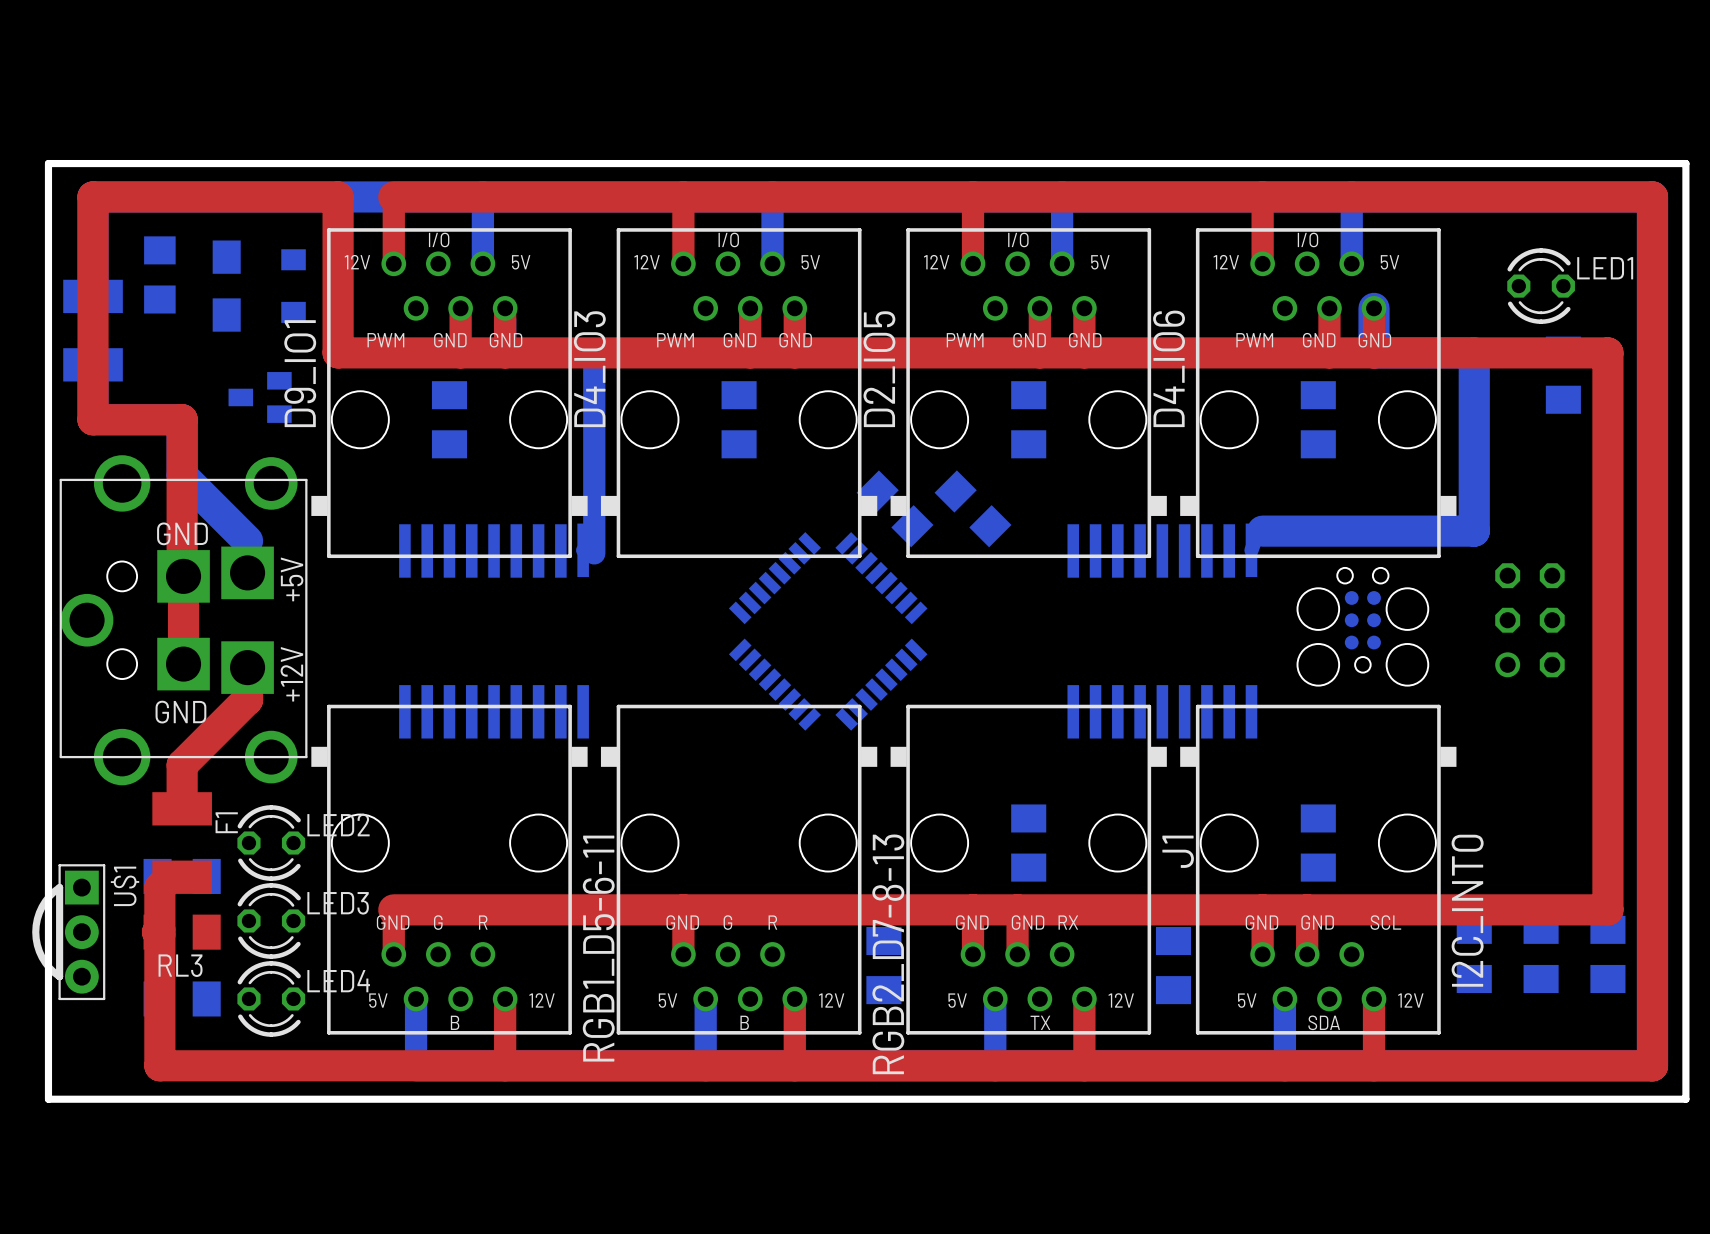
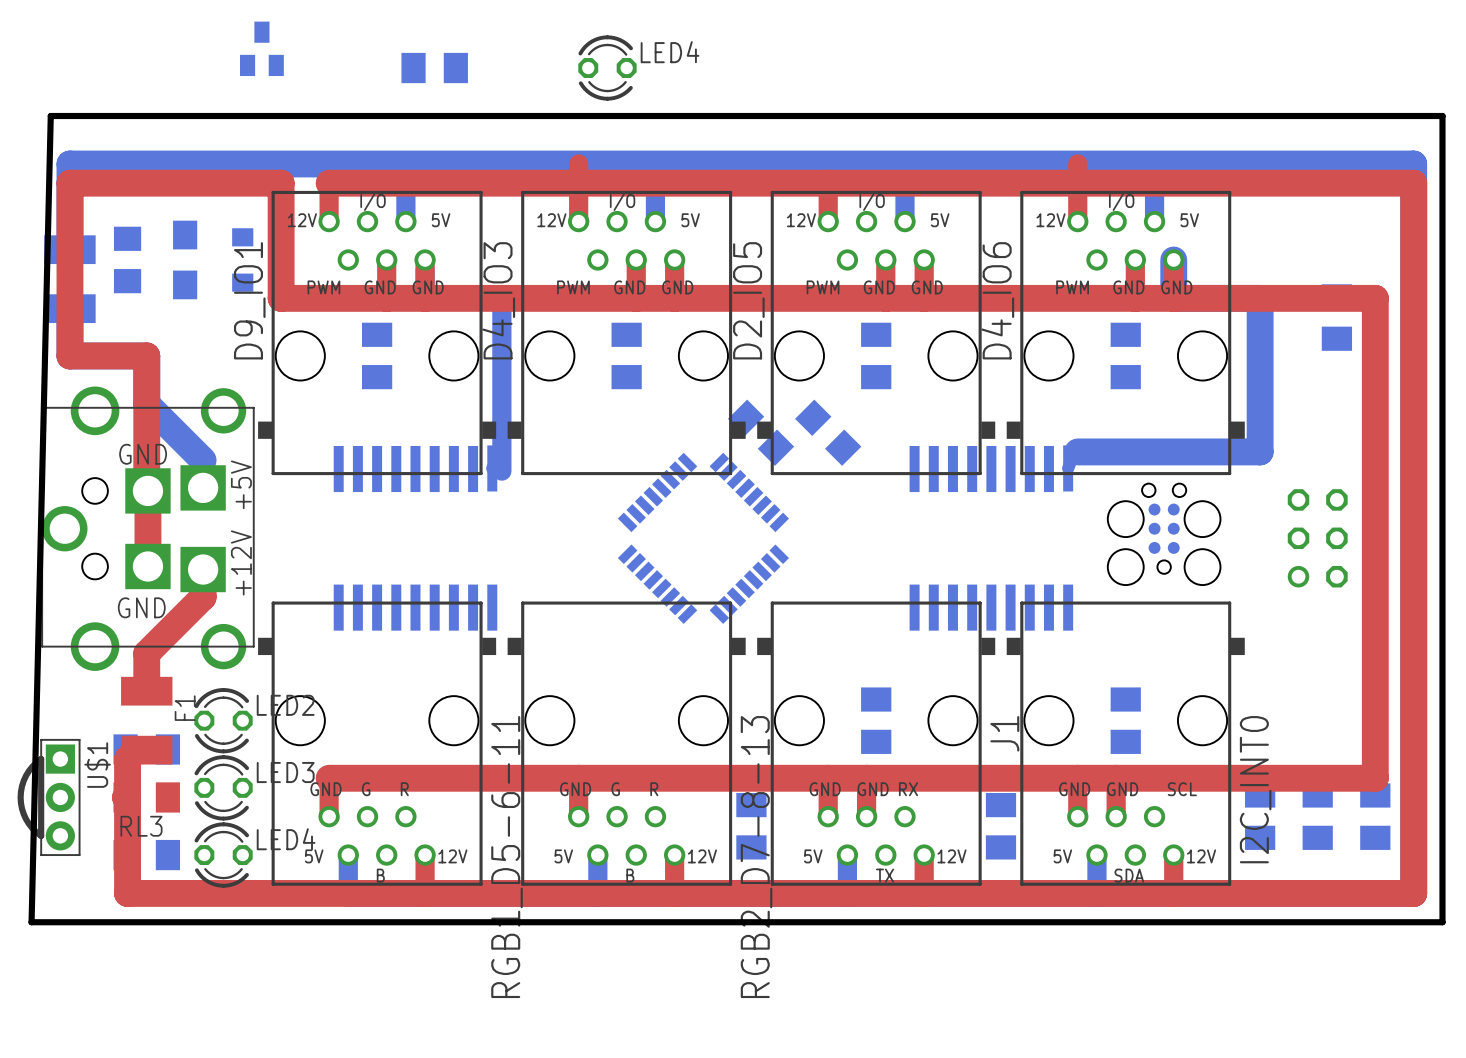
part: none -> (434, 68)
LED4: none -> (607, 68)
board edge: (1685, 163) (48, 163) (48, 1099) (1685, 1099) (1685, 1076) -> (1442, 135) (1442, 116) (50, 116) (31, 922) (1442, 922)
top track: (93, 219) (93, 196) (338, 196) (338, 219) -> (69, 183) (281, 183)
top track: (393, 219) (393, 196) (1652, 196) (1652, 219) -> (329, 183) (1413, 183)
part position: (159, 274) -> (127, 259)
part position: (226, 286) -> (185, 259)
part position: (293, 286) -> (242, 259)
LED1: (1541, 286) -> none
part rotation: 0° (260, 397) -> 90° clockwise (261, 48)
part position: (260, 397) -> (261, 48)
part position: (1529, 620) -> (1317, 538)
top track: (159, 1043) (159, 1065) (1652, 1065) (1652, 1043) -> (127, 893) (1413, 893)

